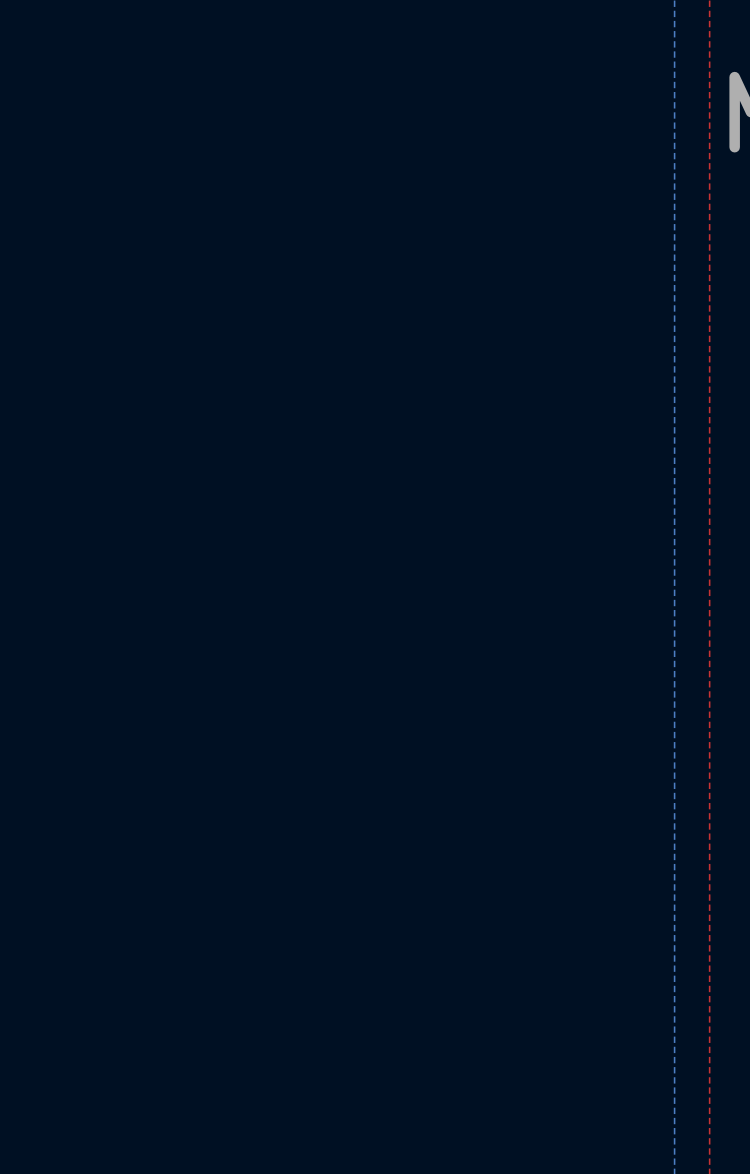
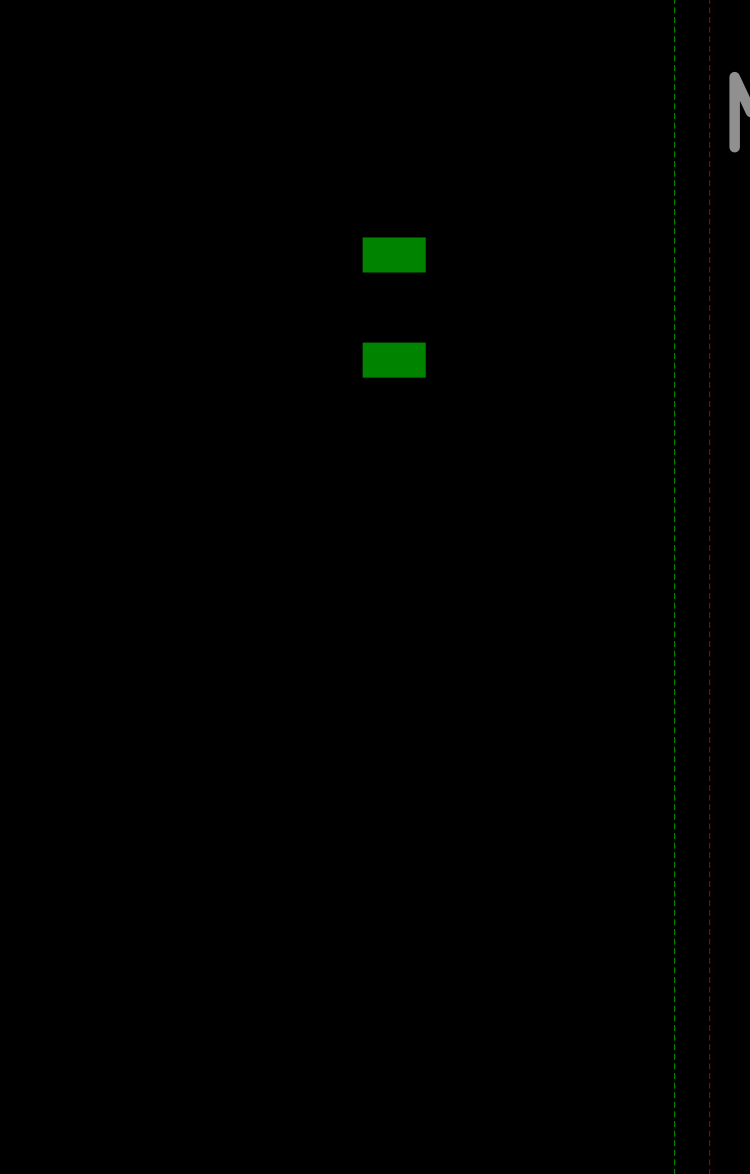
part: none -> (394, 307)

